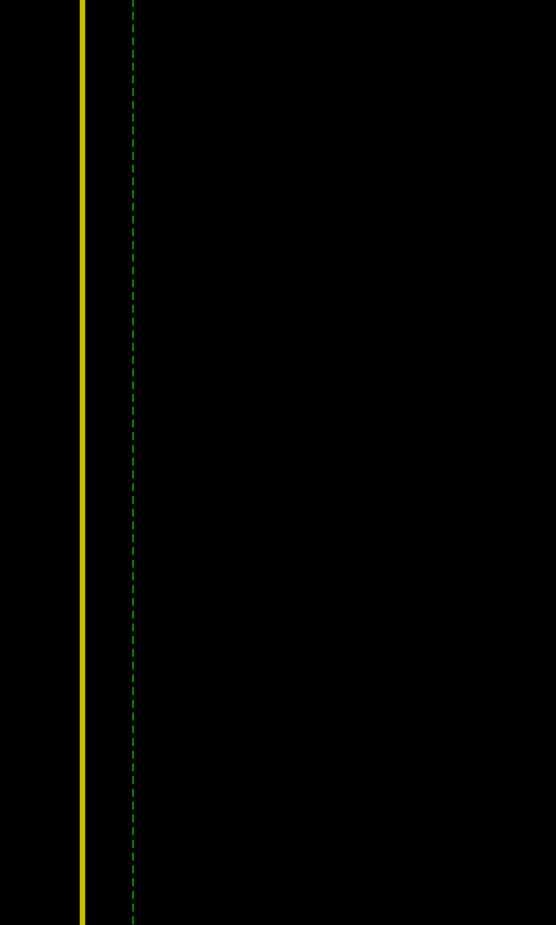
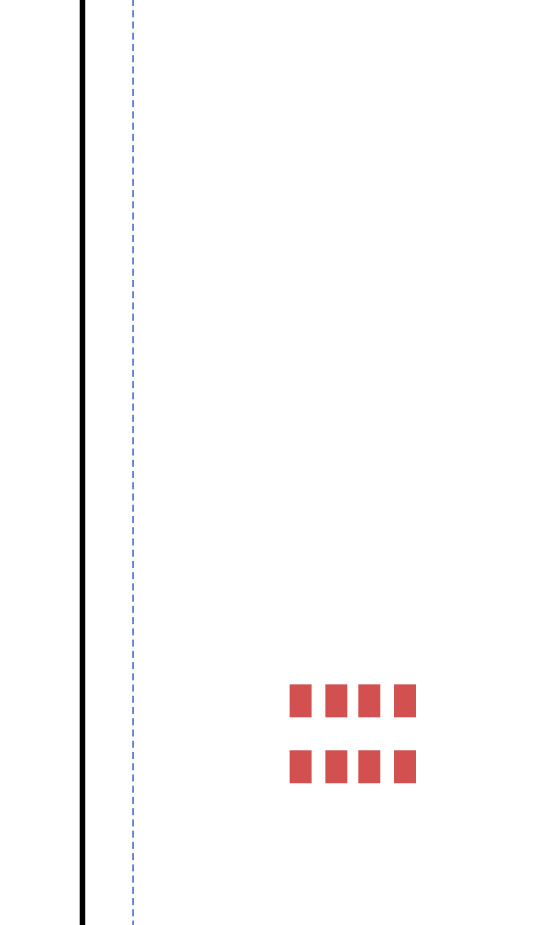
part: none -> (352, 733)

